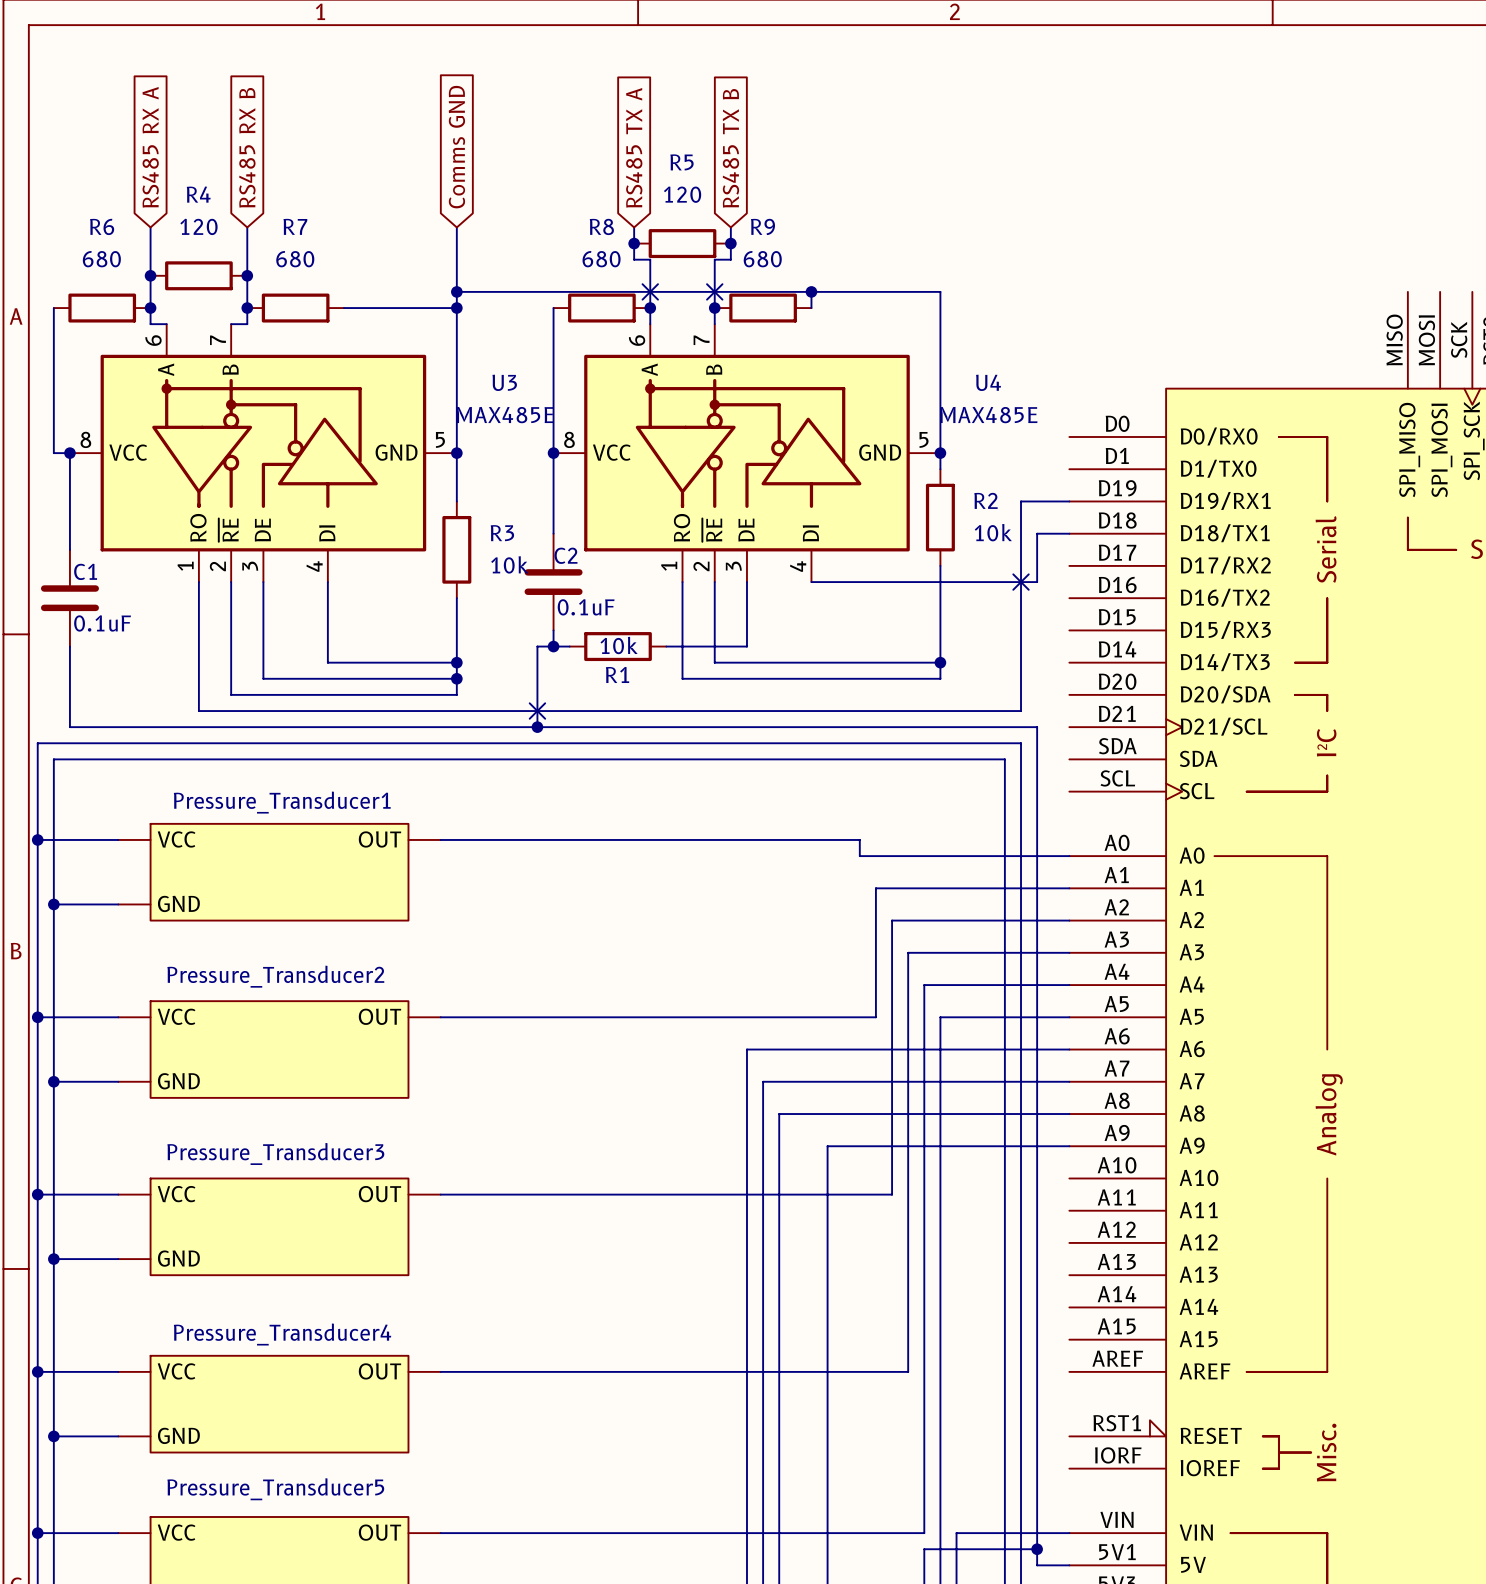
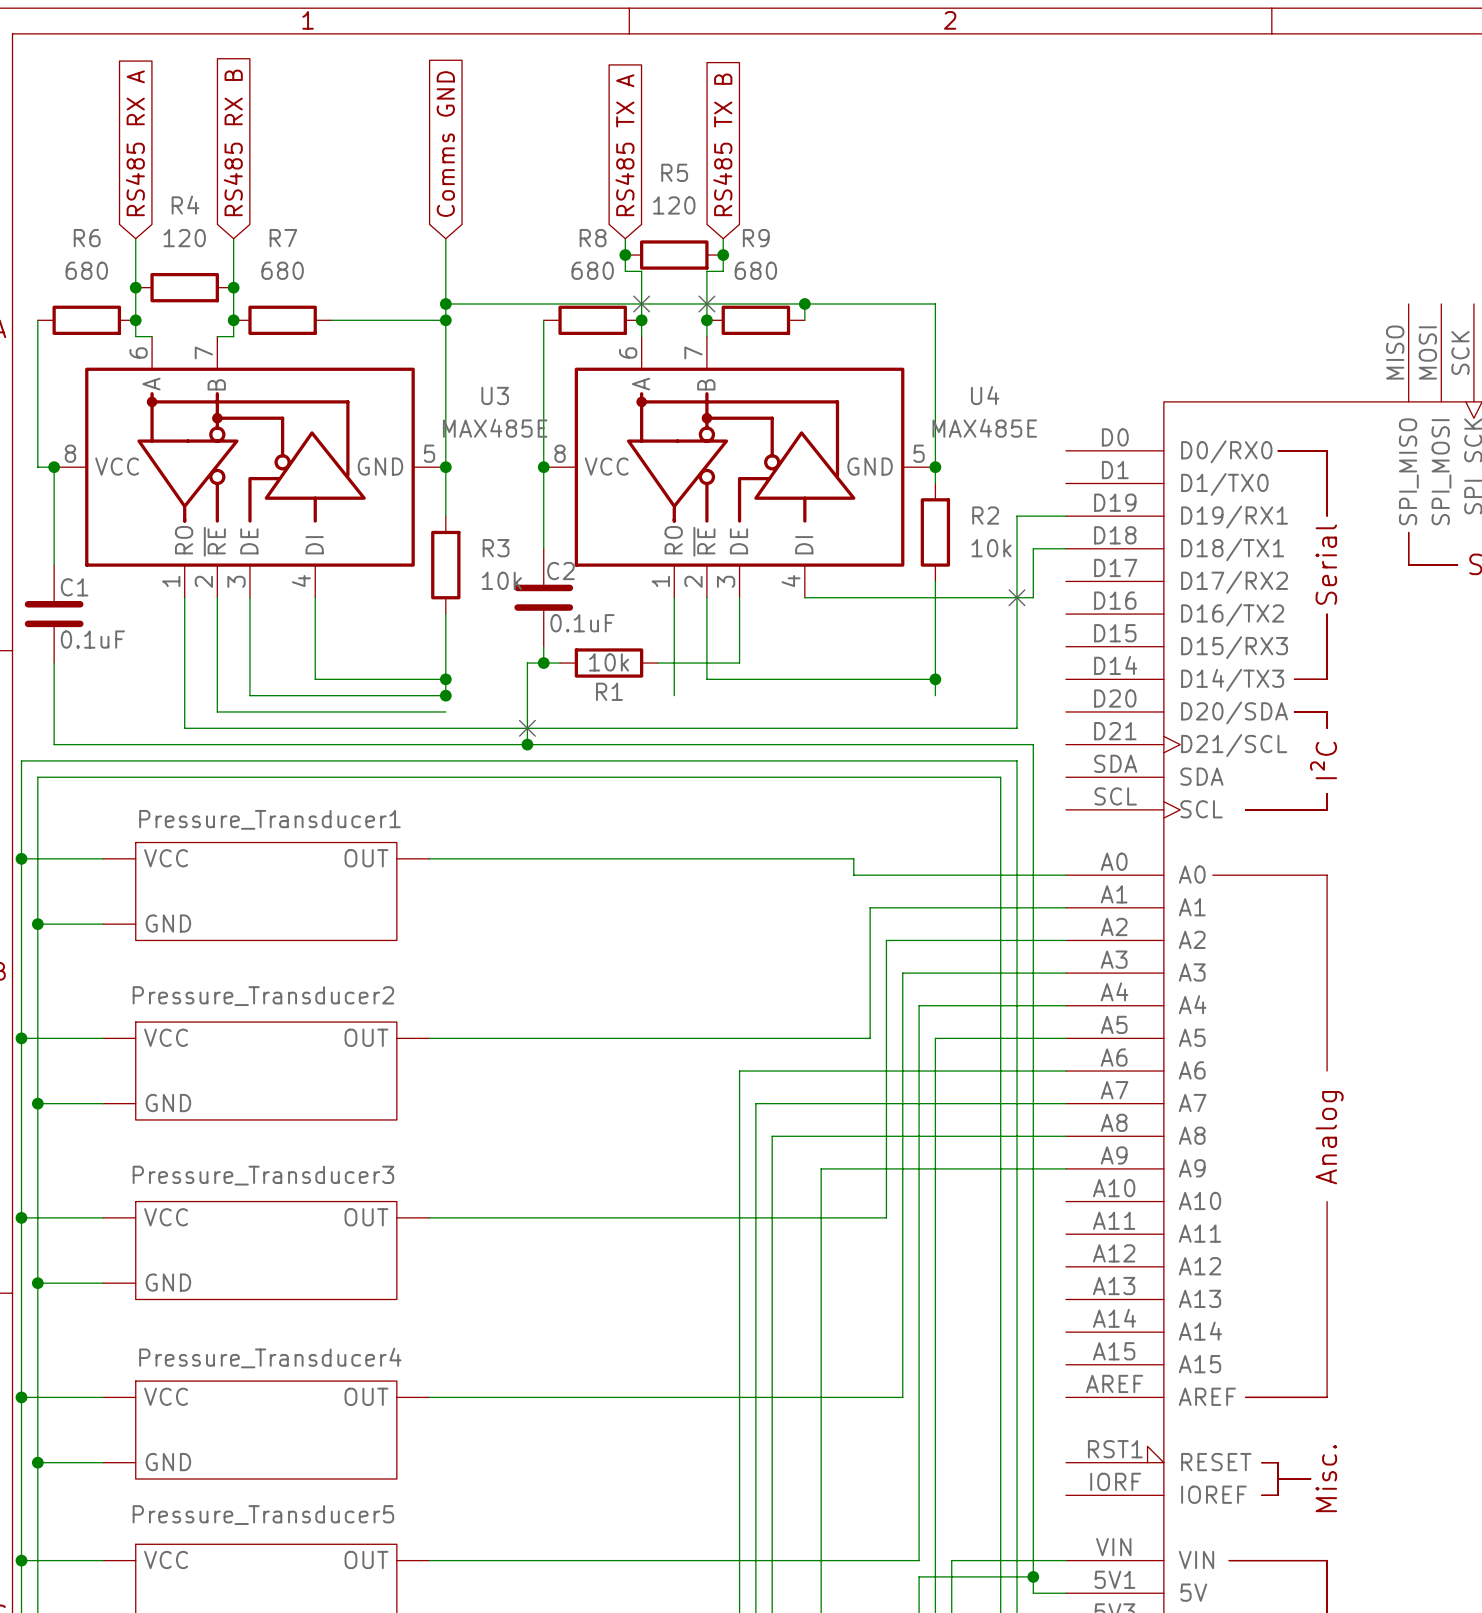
wire: (456, 678) (456, 694) -> none
wire: (682, 678) (940, 678) -> none

